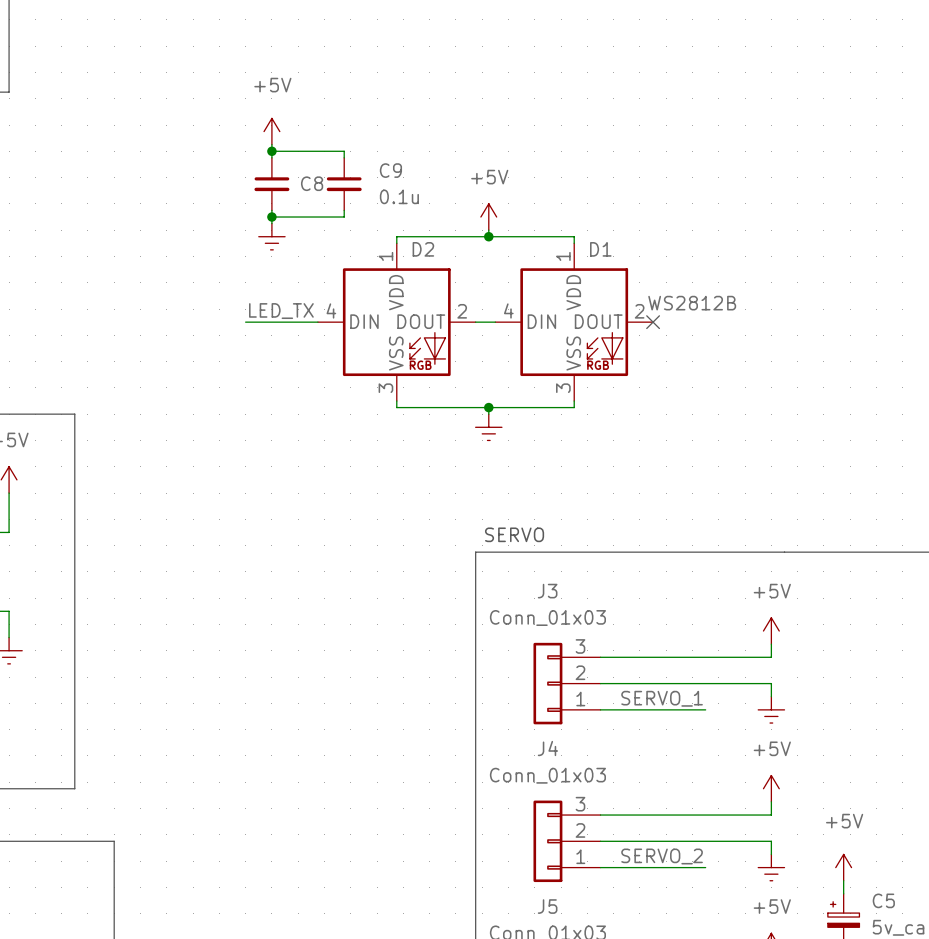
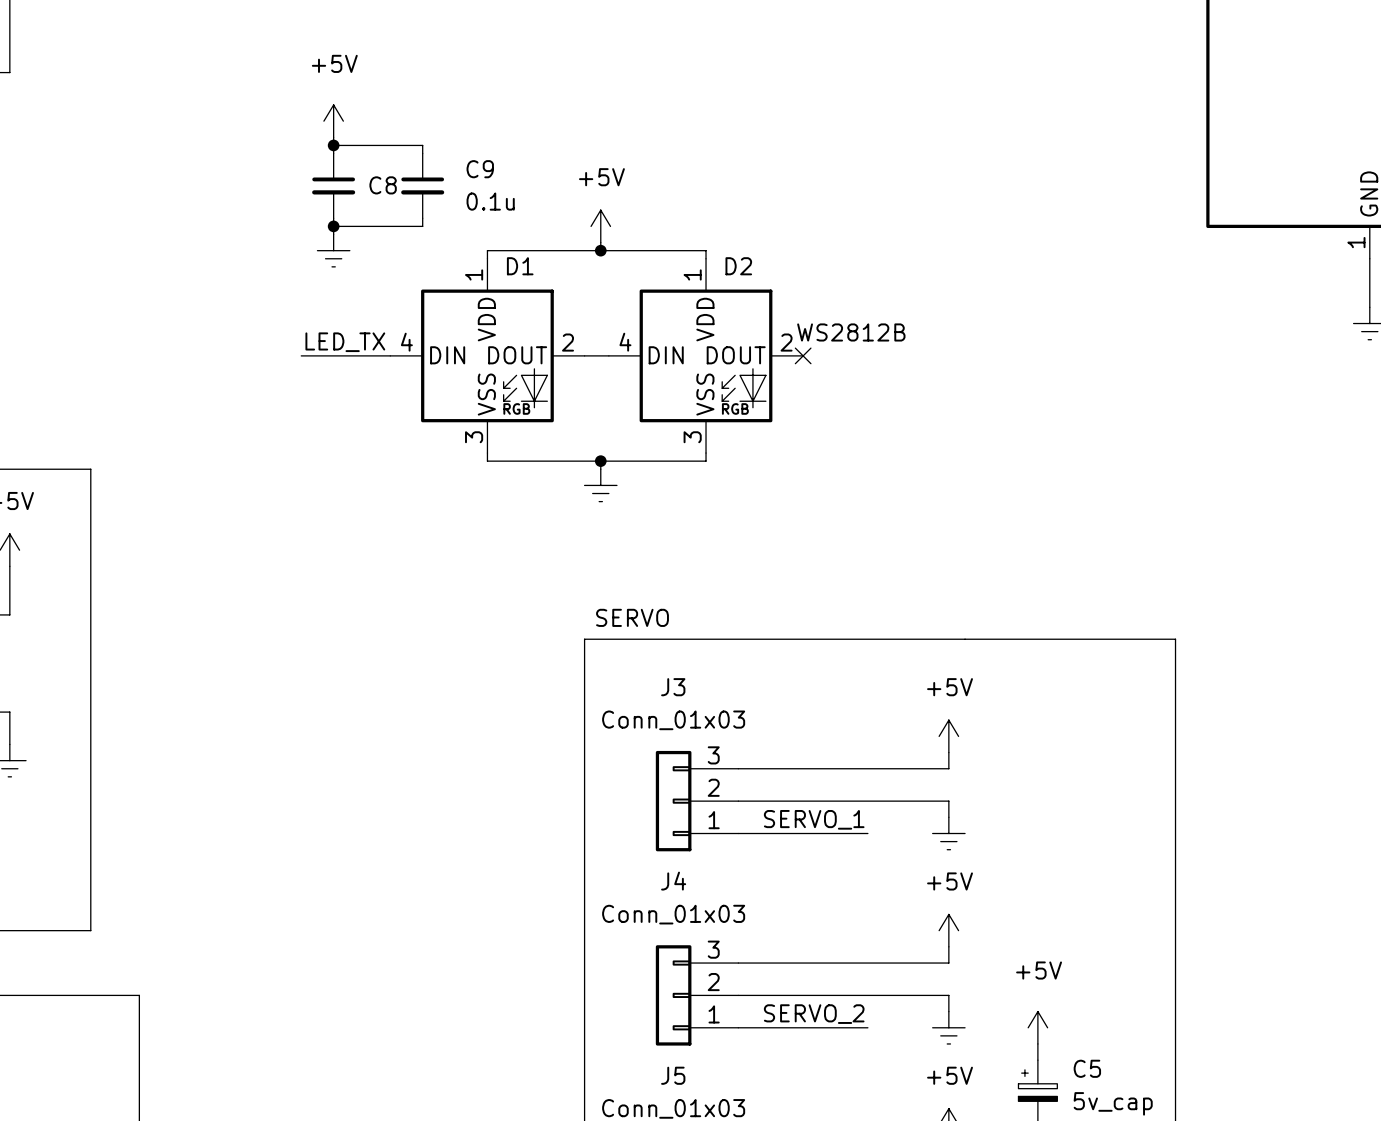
D2 name: D2 (423, 249) -> D1 (520, 266)
D1 name: D1 (600, 249) -> D2 (738, 266)

